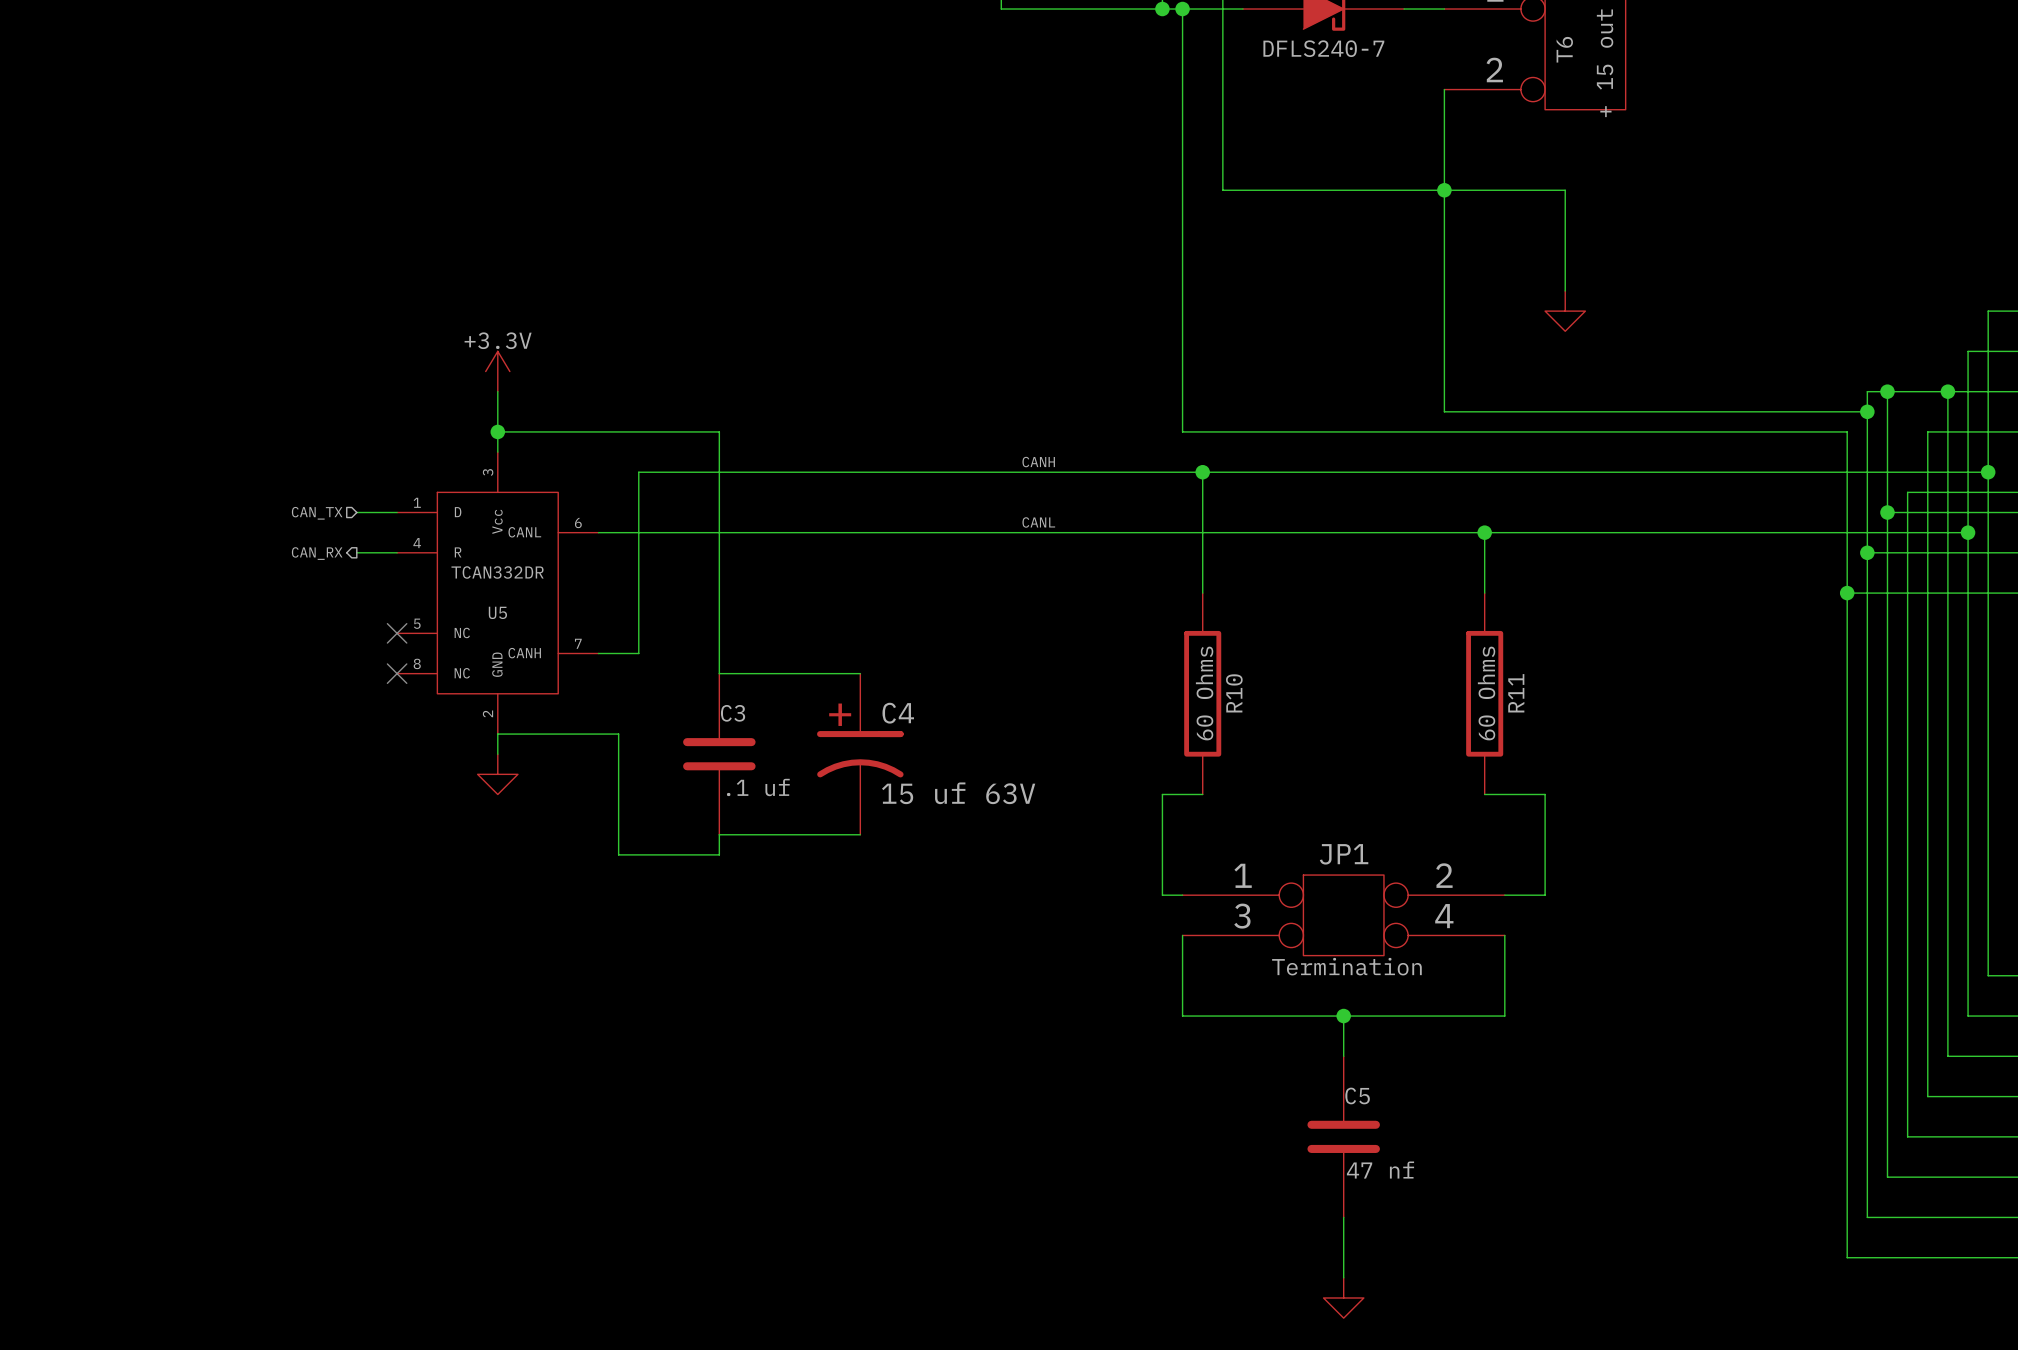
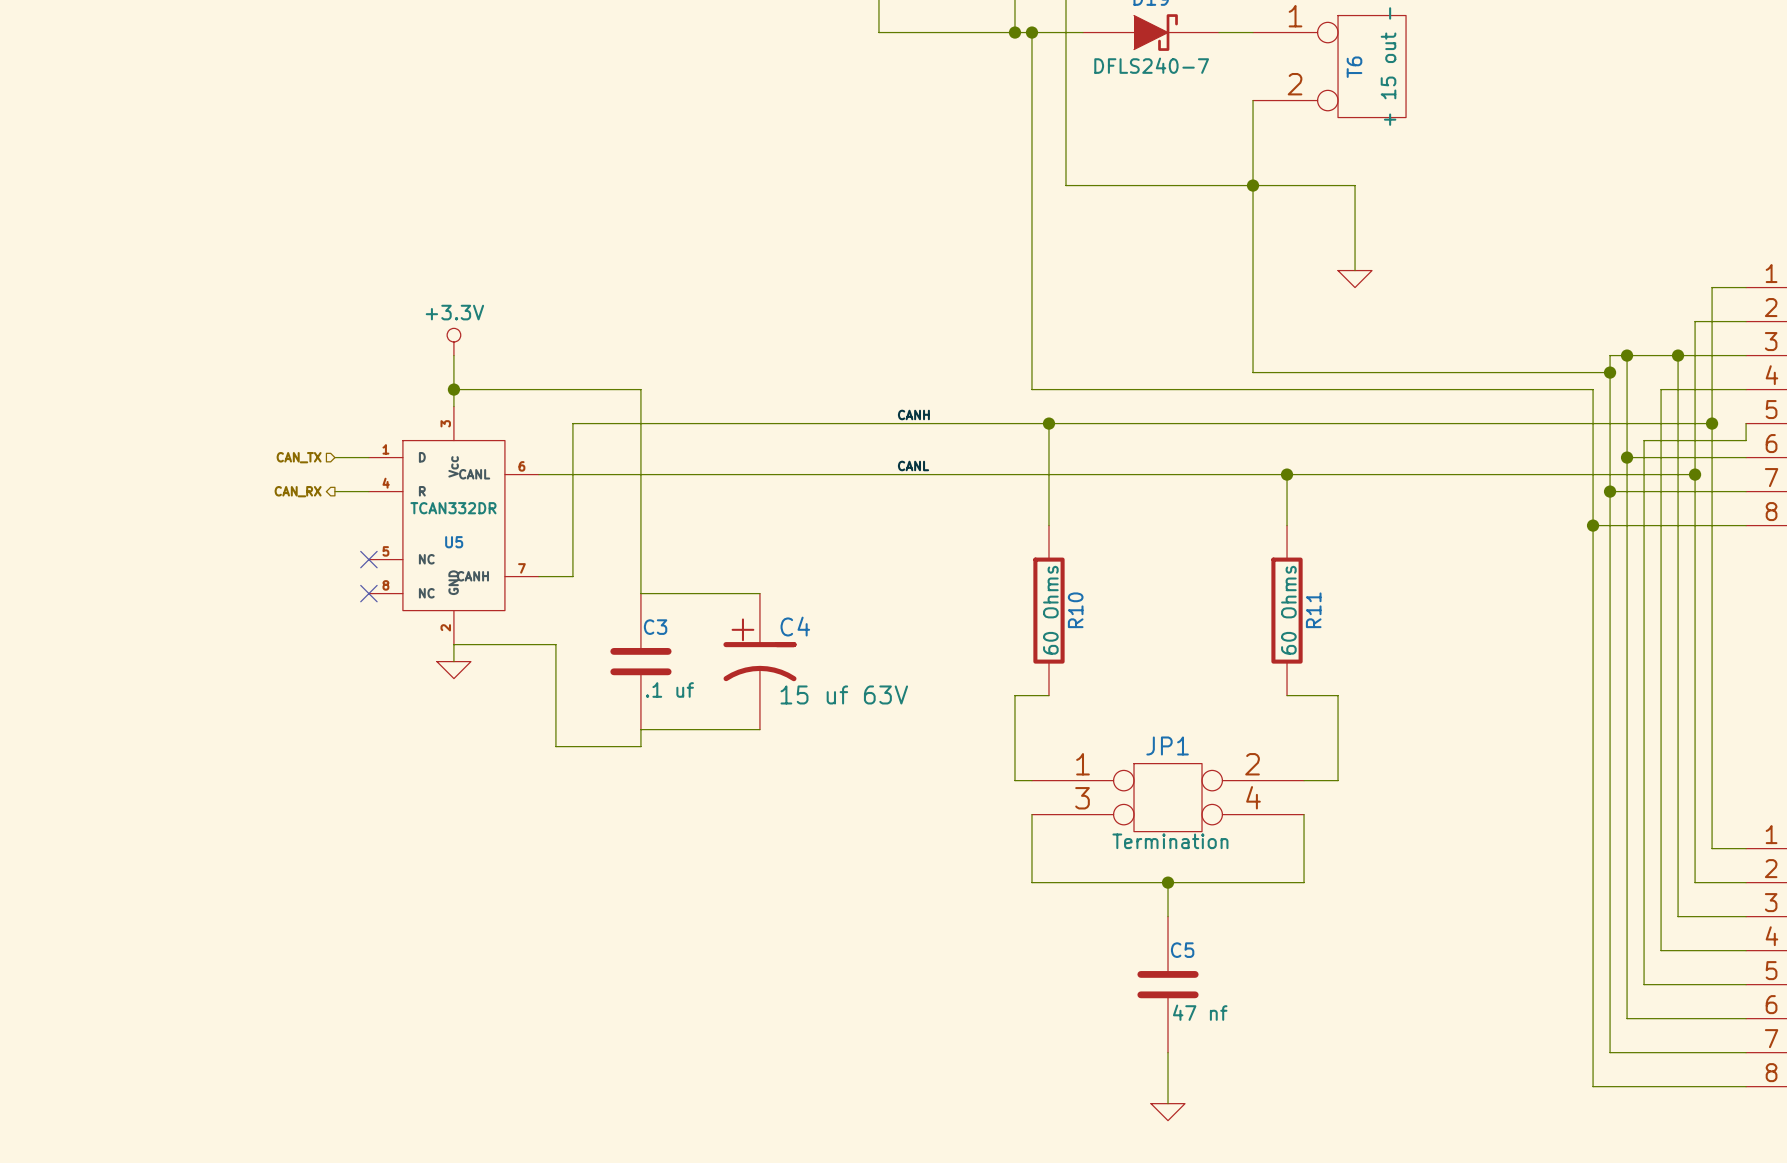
power symbol shape: [1545, 290, 1586, 332] -> [1338, 270, 1373, 288]
power symbol shape: [485, 351, 510, 392] -> [447, 328, 461, 356]
power symbol shape: [477, 754, 518, 795] -> [436, 661, 471, 679]
power symbol shape: [1323, 1277, 1364, 1319] -> [1151, 1103, 1186, 1121]

